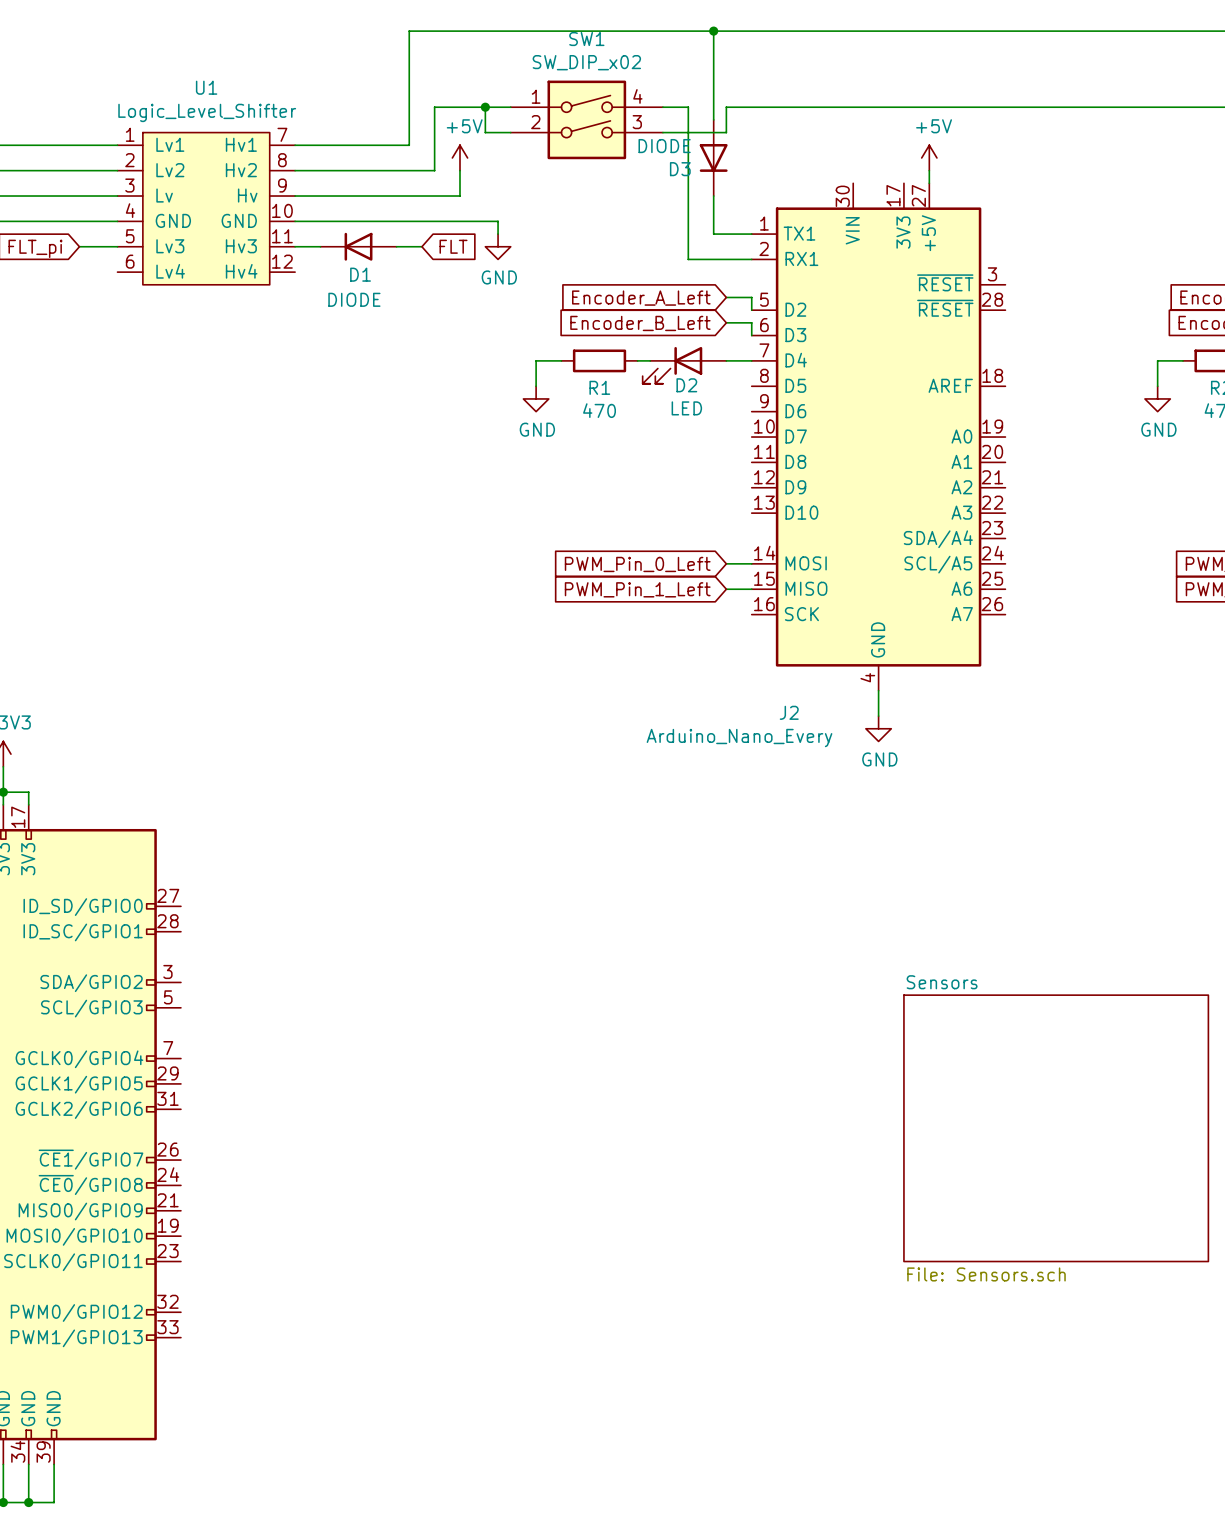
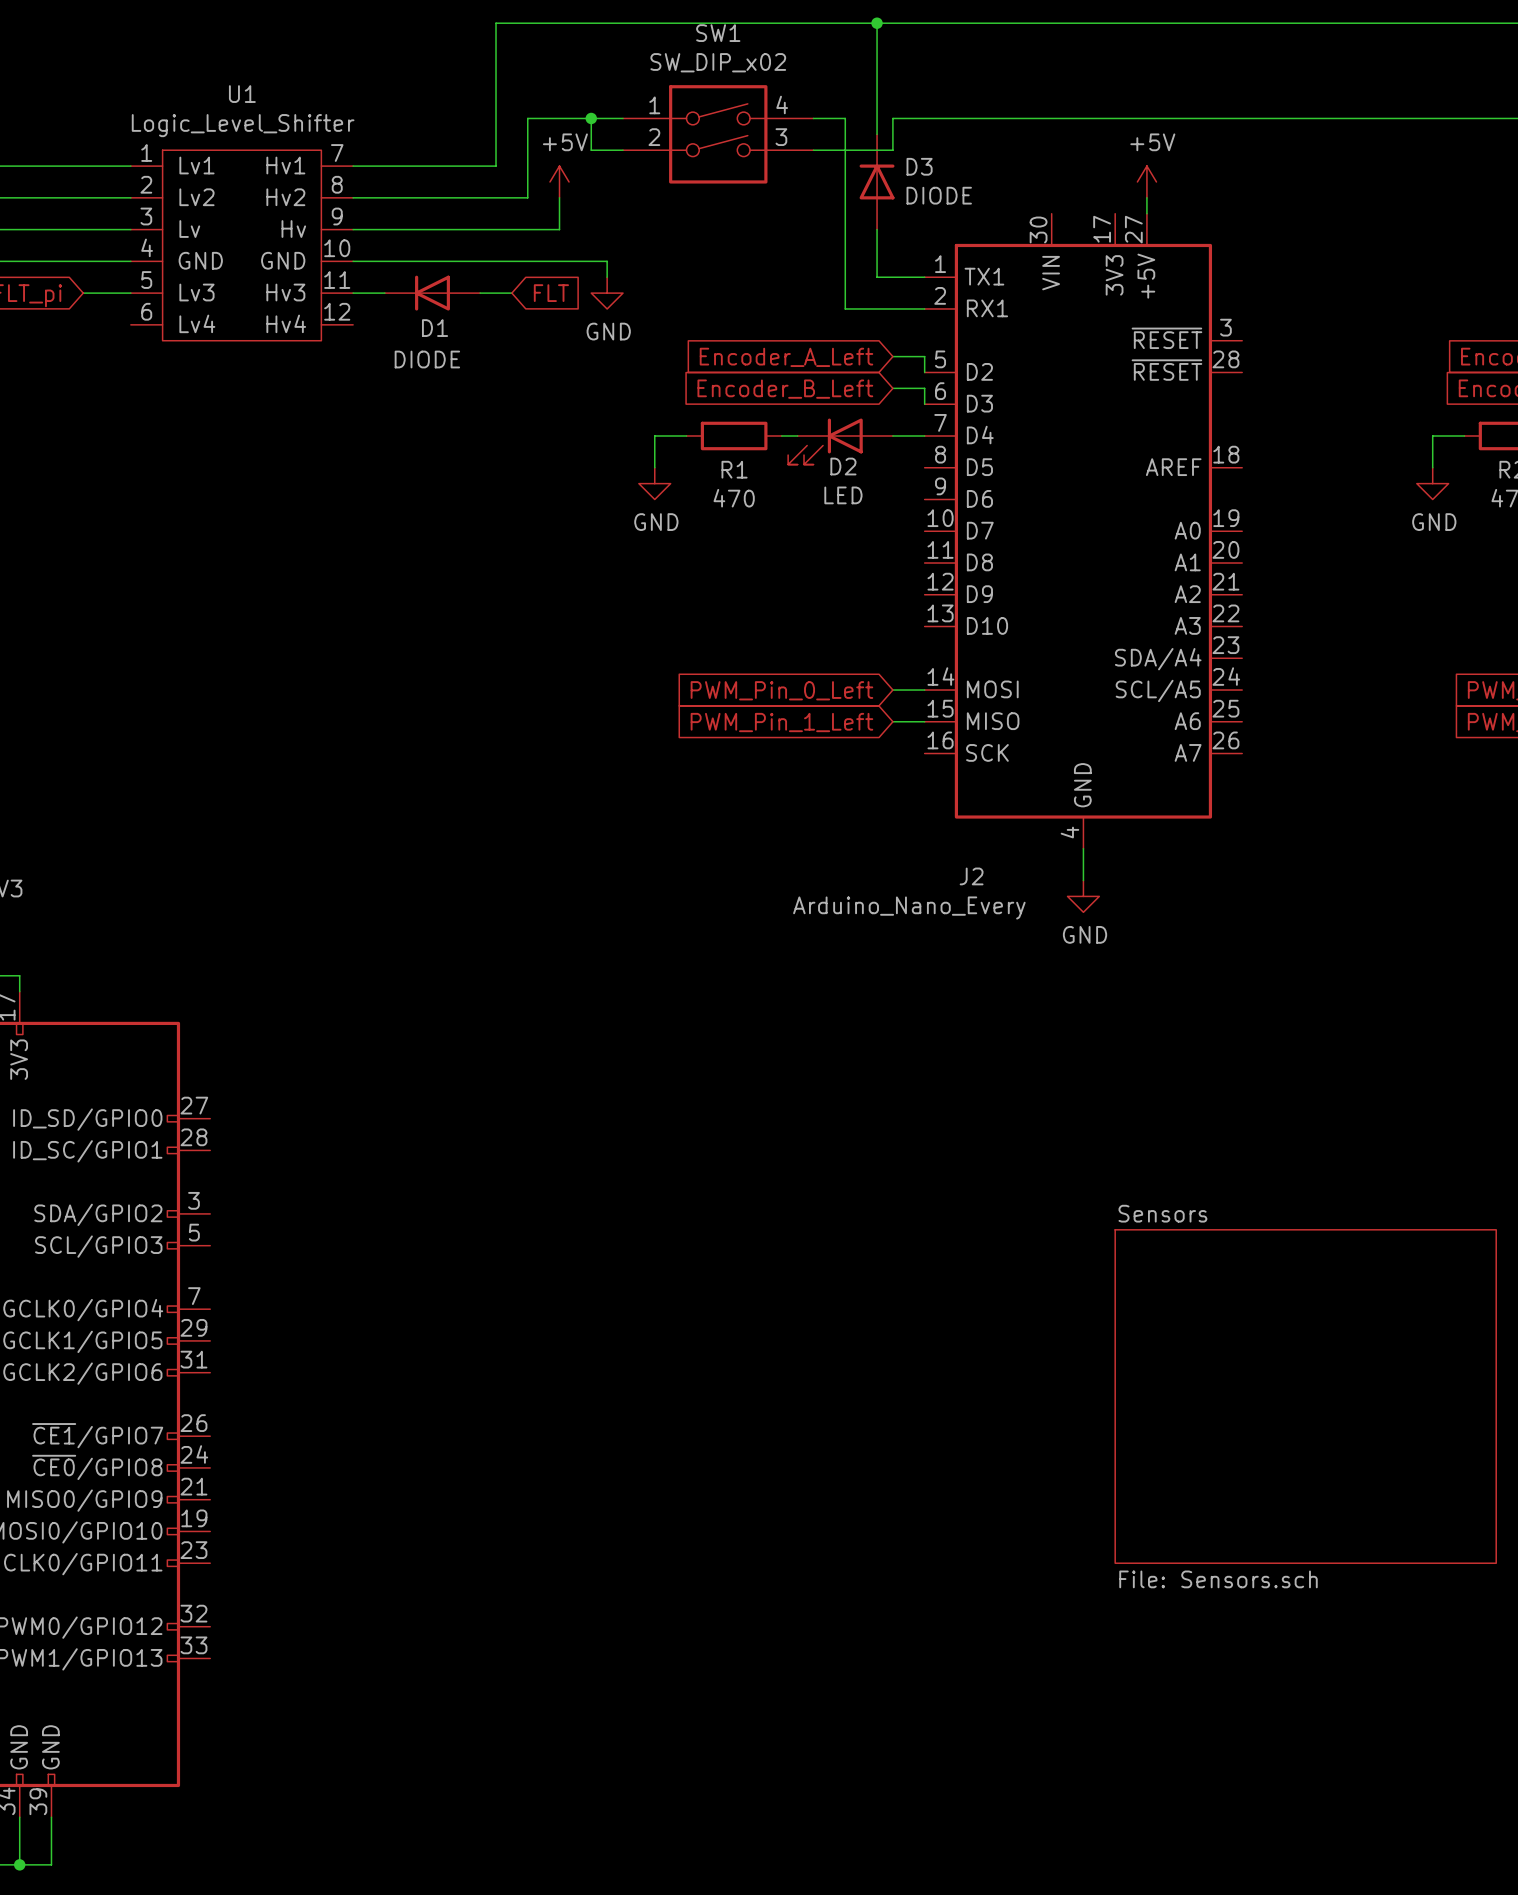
D3 rotation: 0° (713, 157) -> 180° (877, 181)

